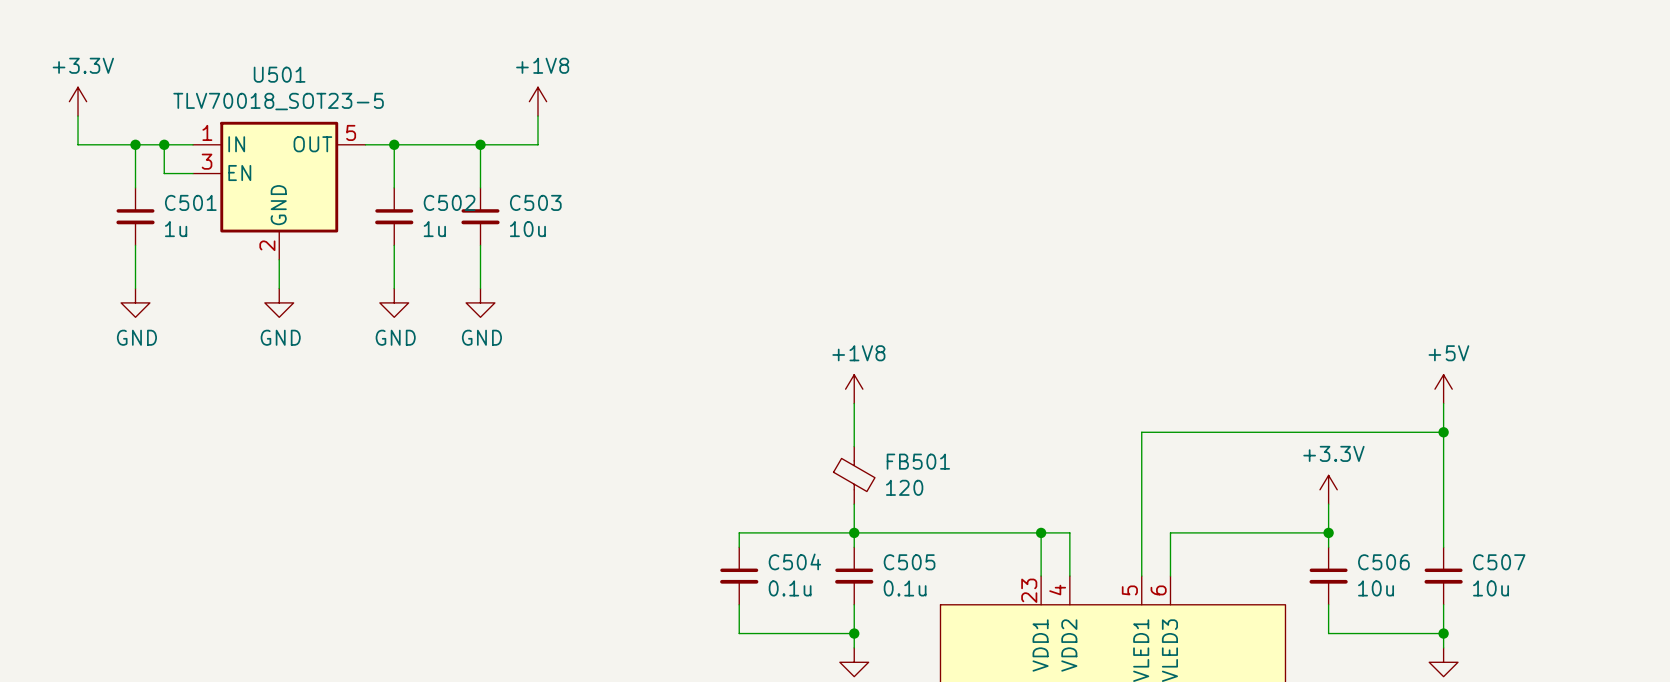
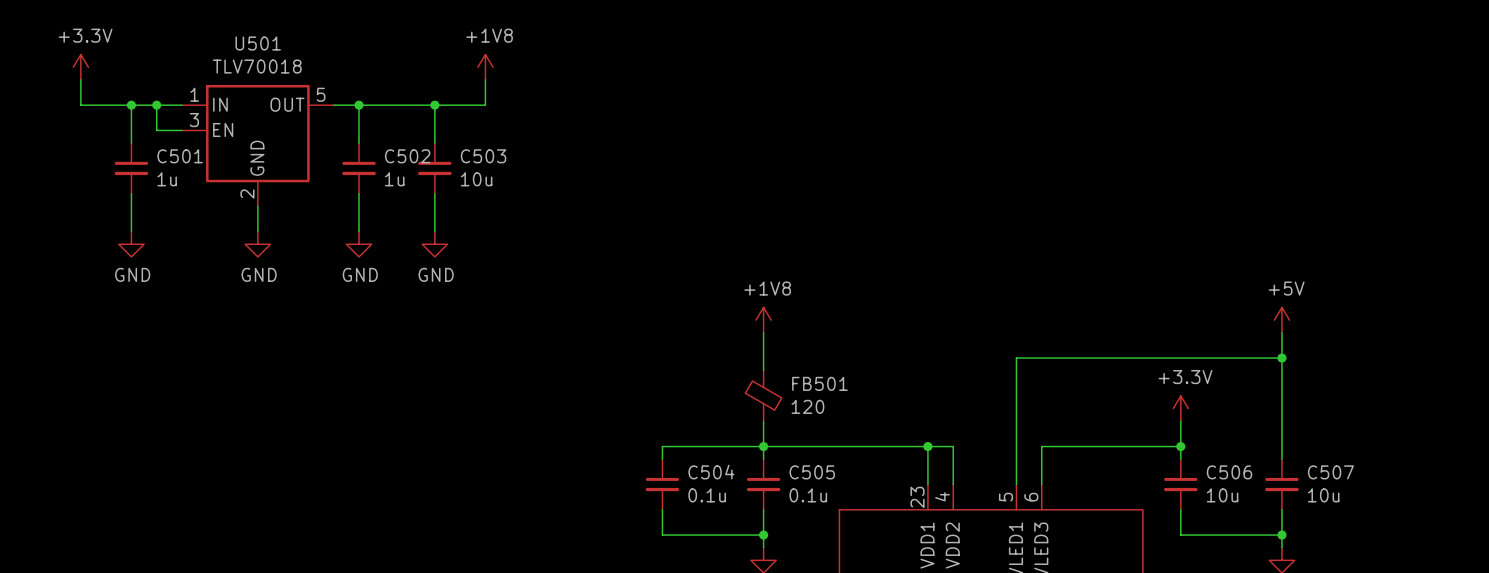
U501 value: TLV70018_SOT23-5 (278, 101) -> TLV70018 (257, 66)

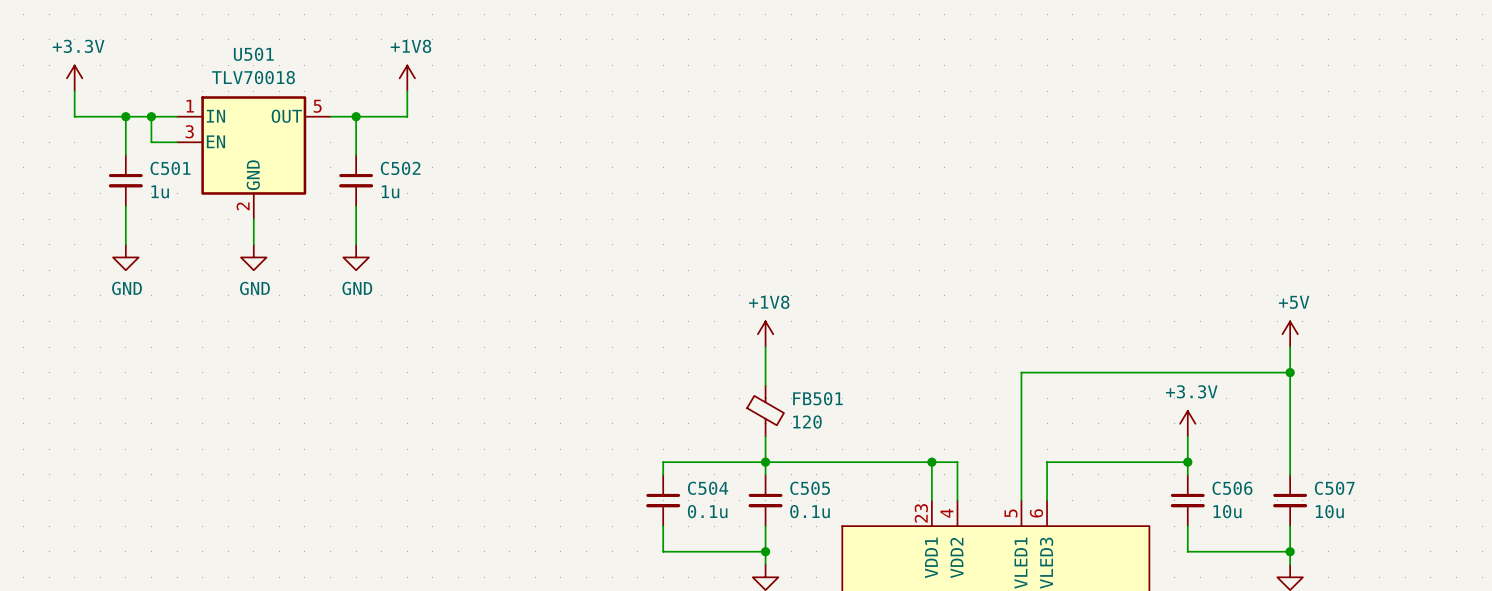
power symbol position: +1V8 (485, 67) -> +1V8 (407, 78)
wire: (485, 79) (485, 105) (409, 105) -> (407, 91) (407, 116)
wire: (434, 105) (434, 143) -> none
junction: (434, 105) -> none
C503: 10u (434, 168) -> none
wire: (434, 193) (434, 231) -> none
power symbol: GND (434, 244) -> none

